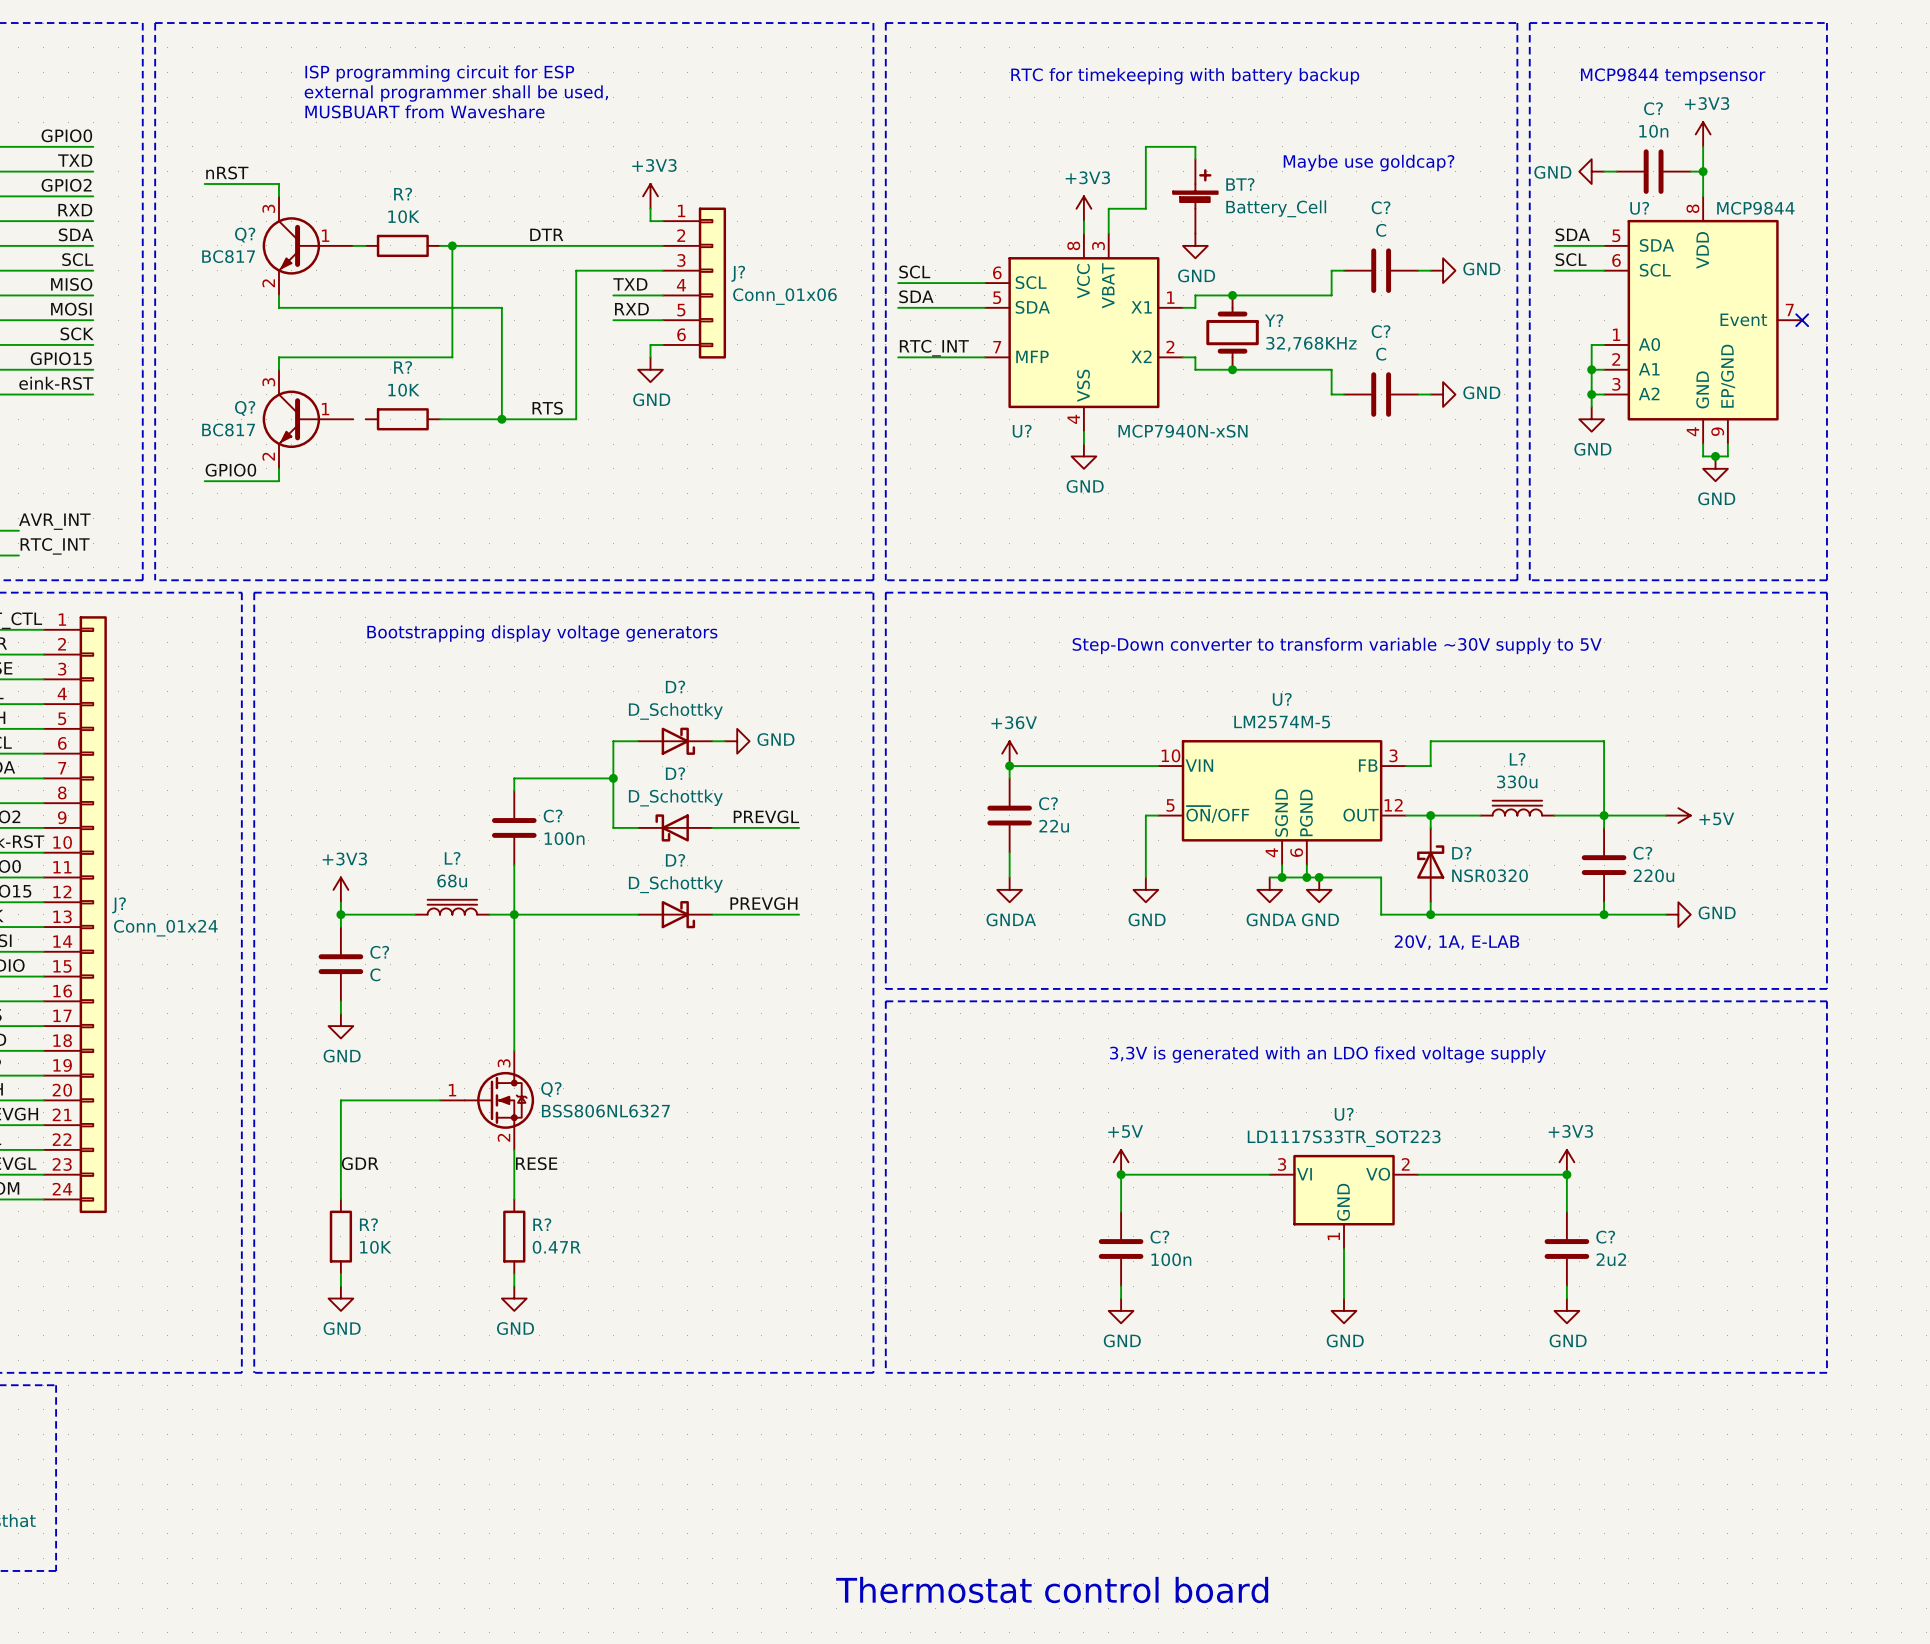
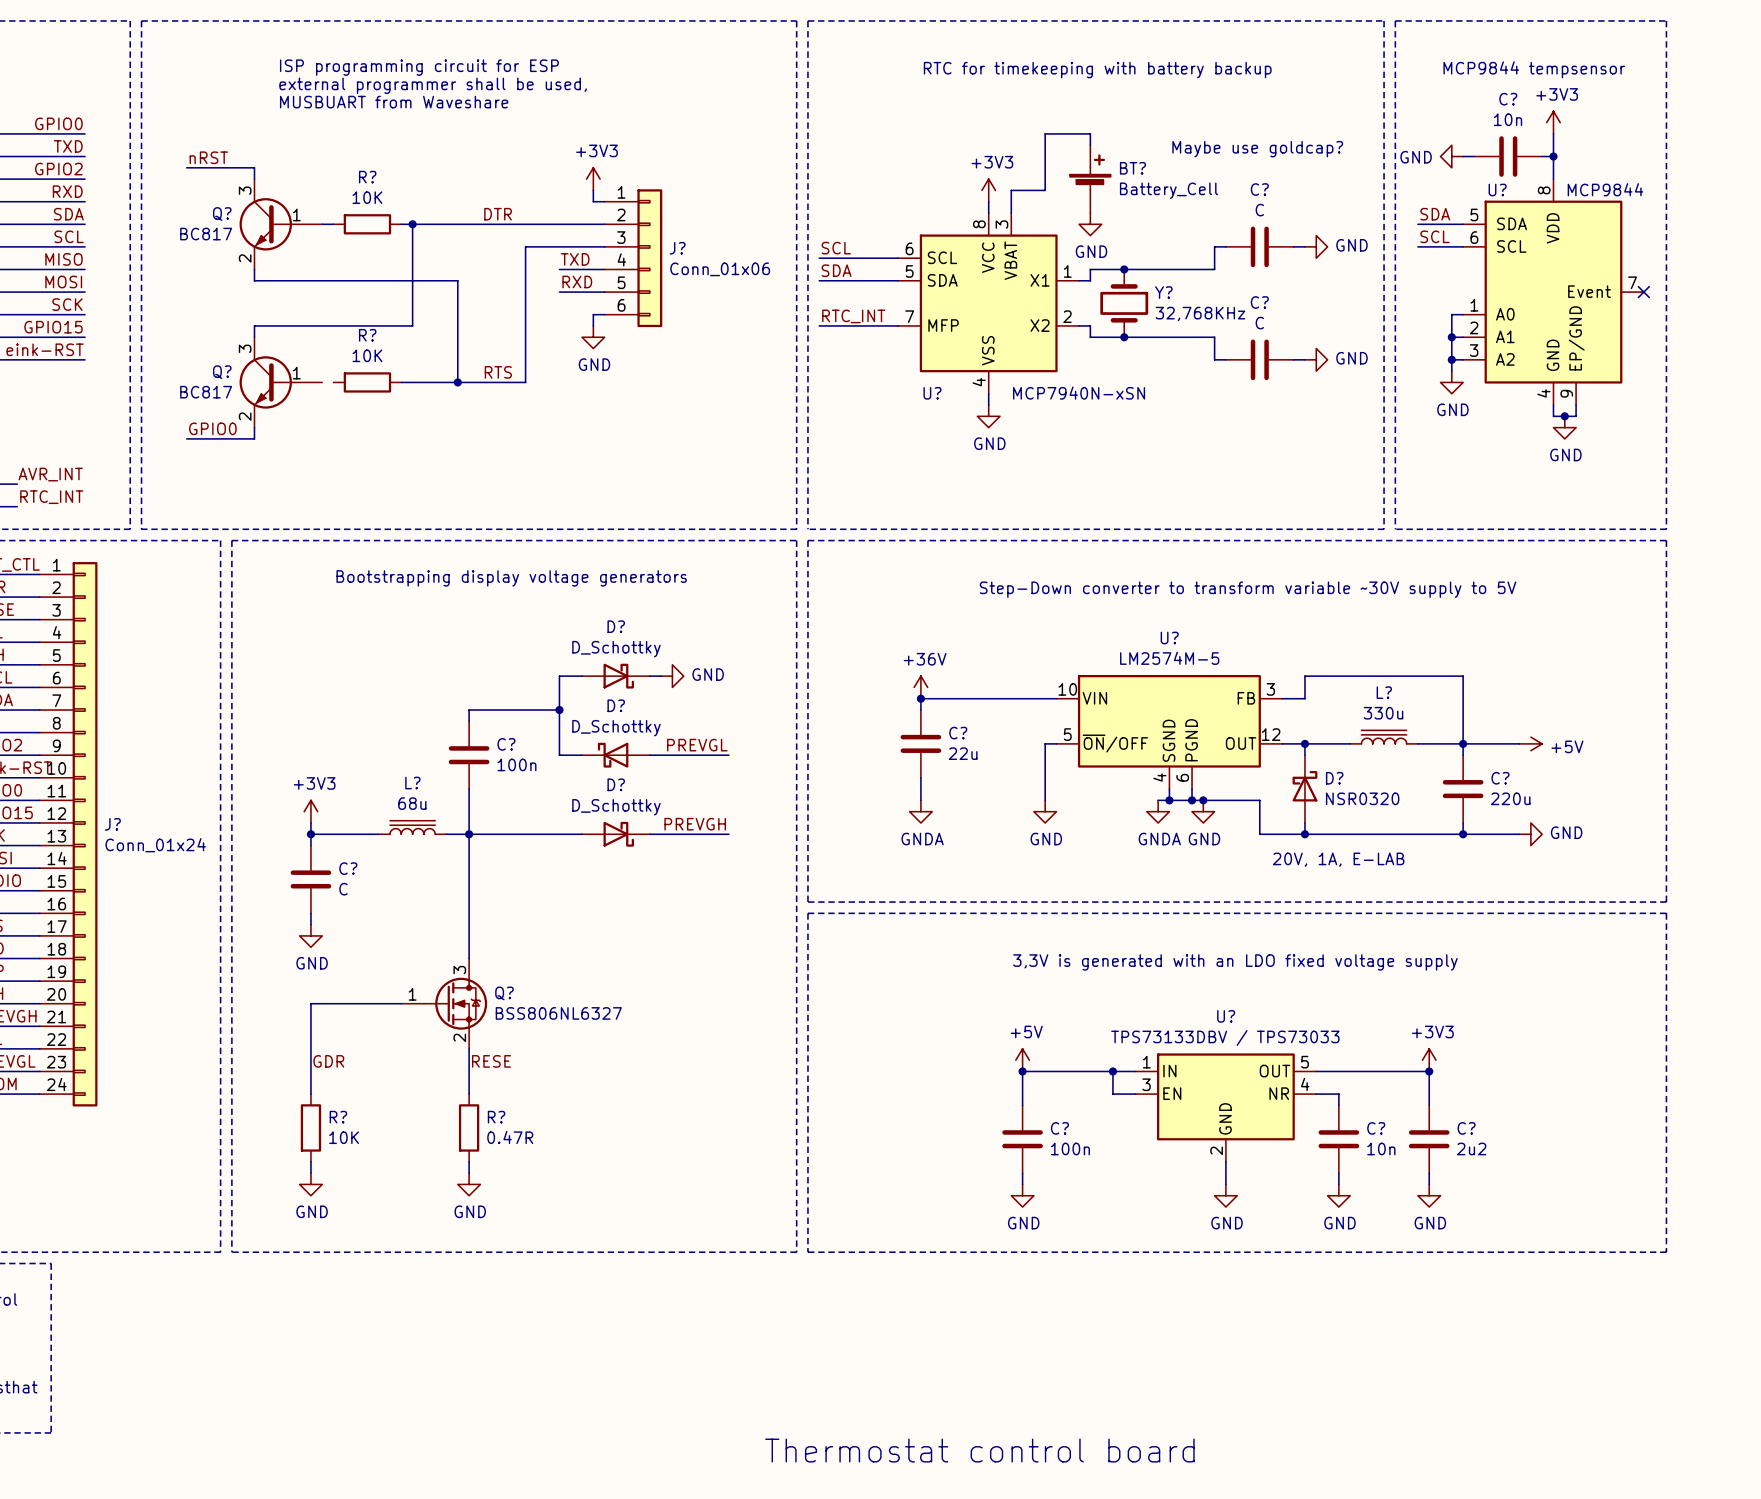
wire: none -> (1112, 1071) (1112, 1094) (1135, 1094)
junction: none -> (1112, 1071)
wire: none -> (1316, 1094) (1338, 1094) (1338, 1105)
U?: LD1117S33TR_SOT223 (1344, 1201) -> none
U?: none -> TPS73133DBV / TPS73033 (1225, 1107)
C?: none -> 10n (1338, 1139)
wire: none -> (1338, 1173) (1338, 1184)
power symbol: none -> GND (1338, 1195)

